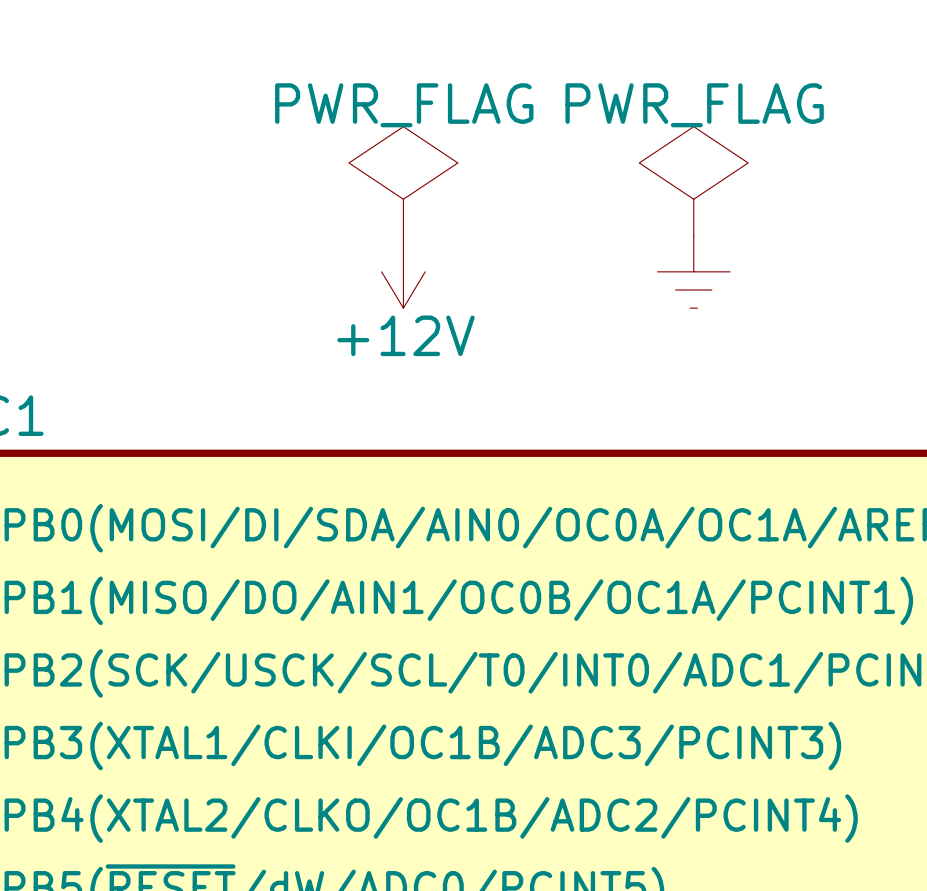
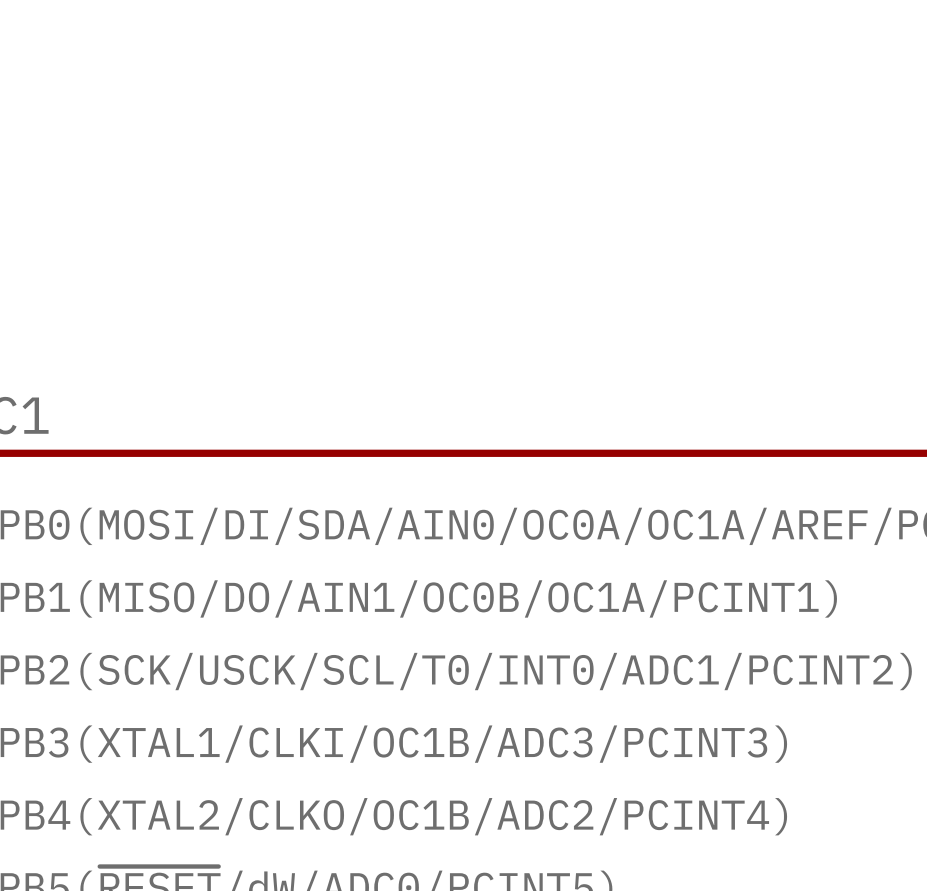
power symbol: PWR_FLAG (403, 181) -> none
power symbol: PWR_FLAG (693, 181) -> none
power symbol: +12V (403, 271) -> none
power symbol: (693, 271) -> none

